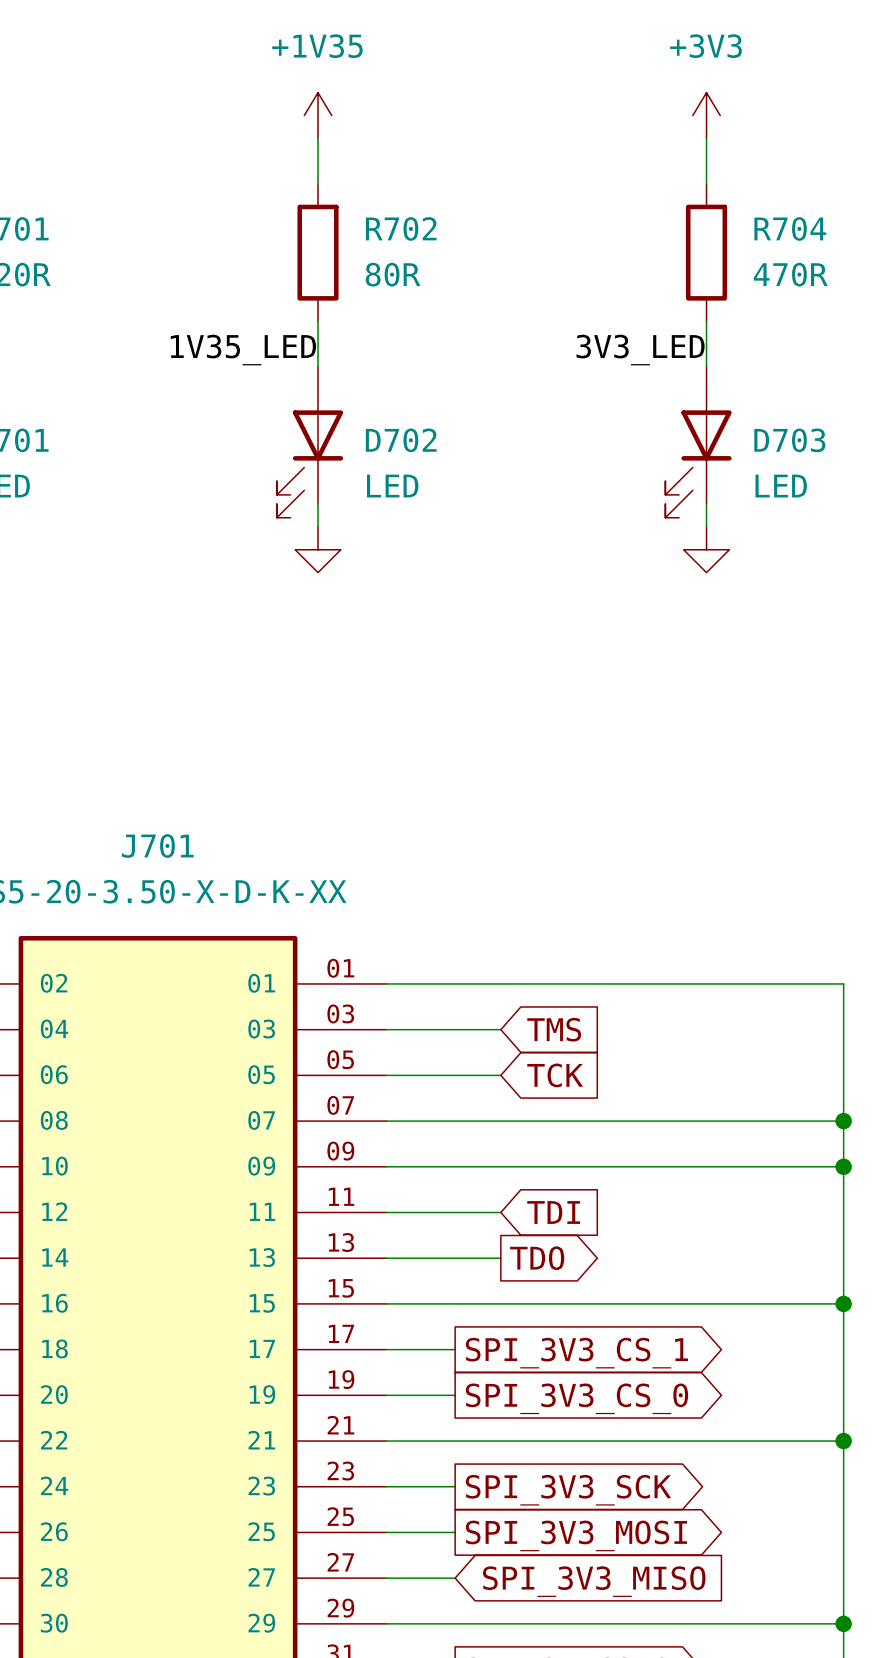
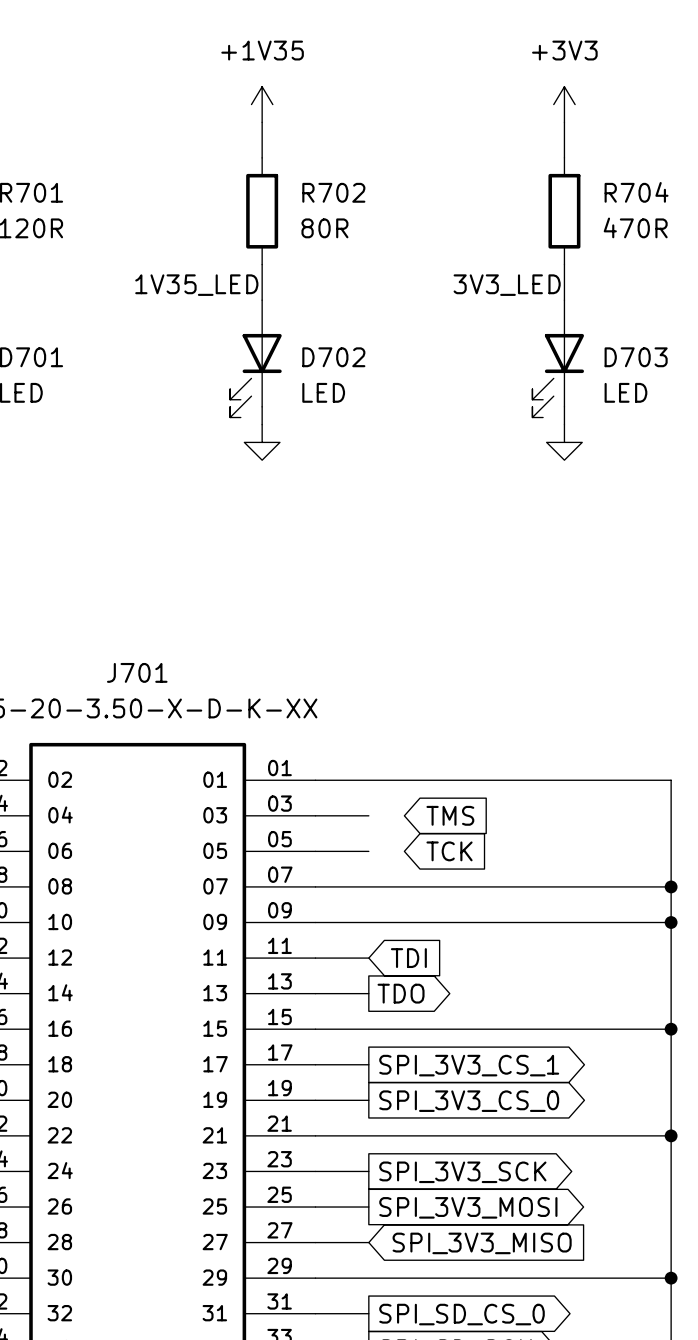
wire: (455, 1029) (500, 1029) -> none
wire: (455, 1075) (500, 1075) -> none
wire: (455, 1212) (500, 1212) -> none
global label position: TDI (553, 1212) -> TDI (408, 958)
wire: (455, 1258) (500, 1258) -> none
global label position: TDO (537, 1258) -> TDO (401, 993)

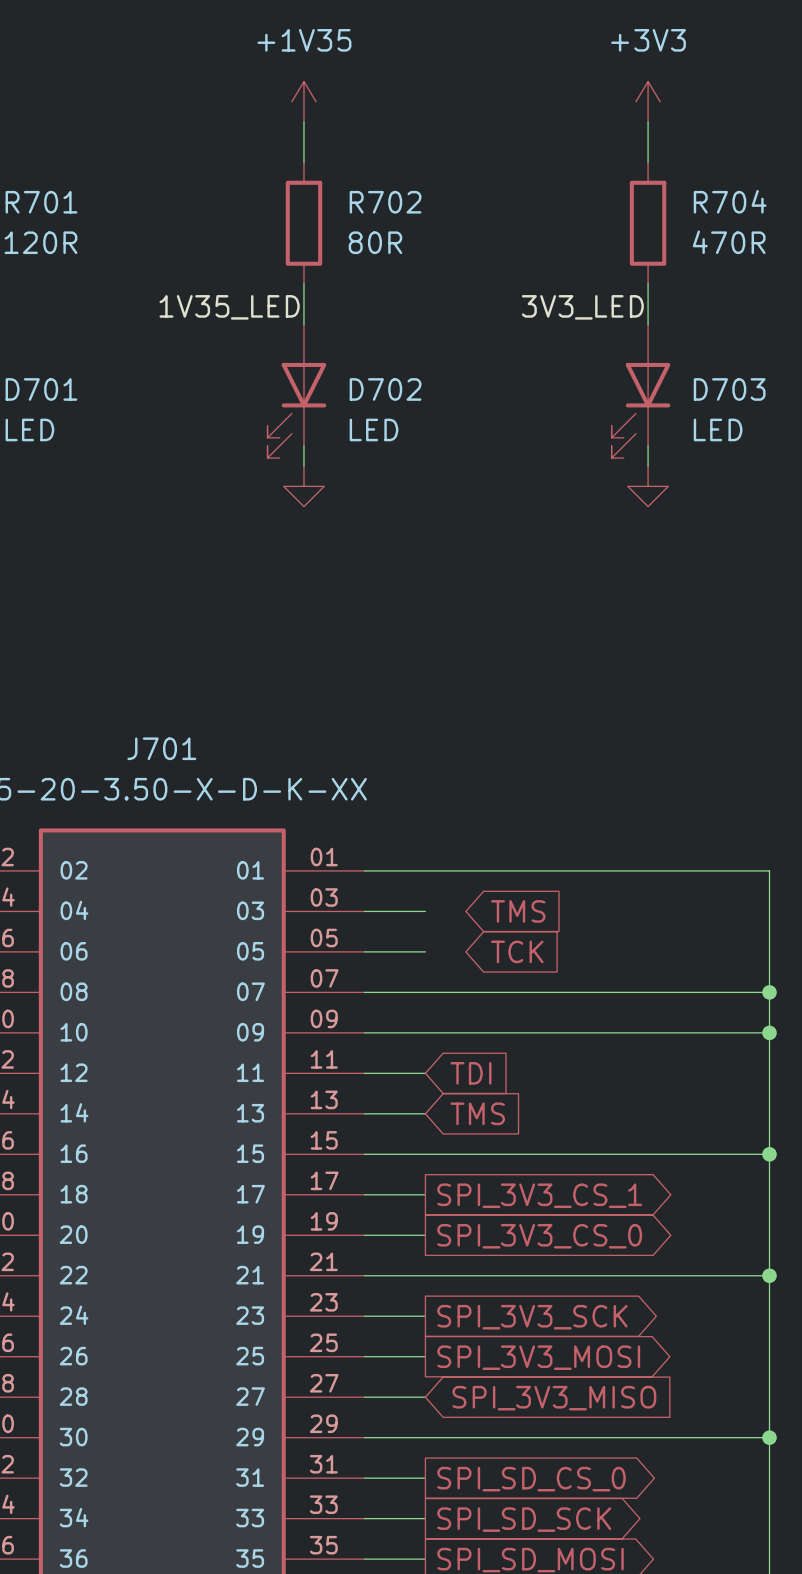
global label shape: output (401, 993) -> input (477, 1113)
global label: TDO (401, 993) -> TMS (477, 1113)

